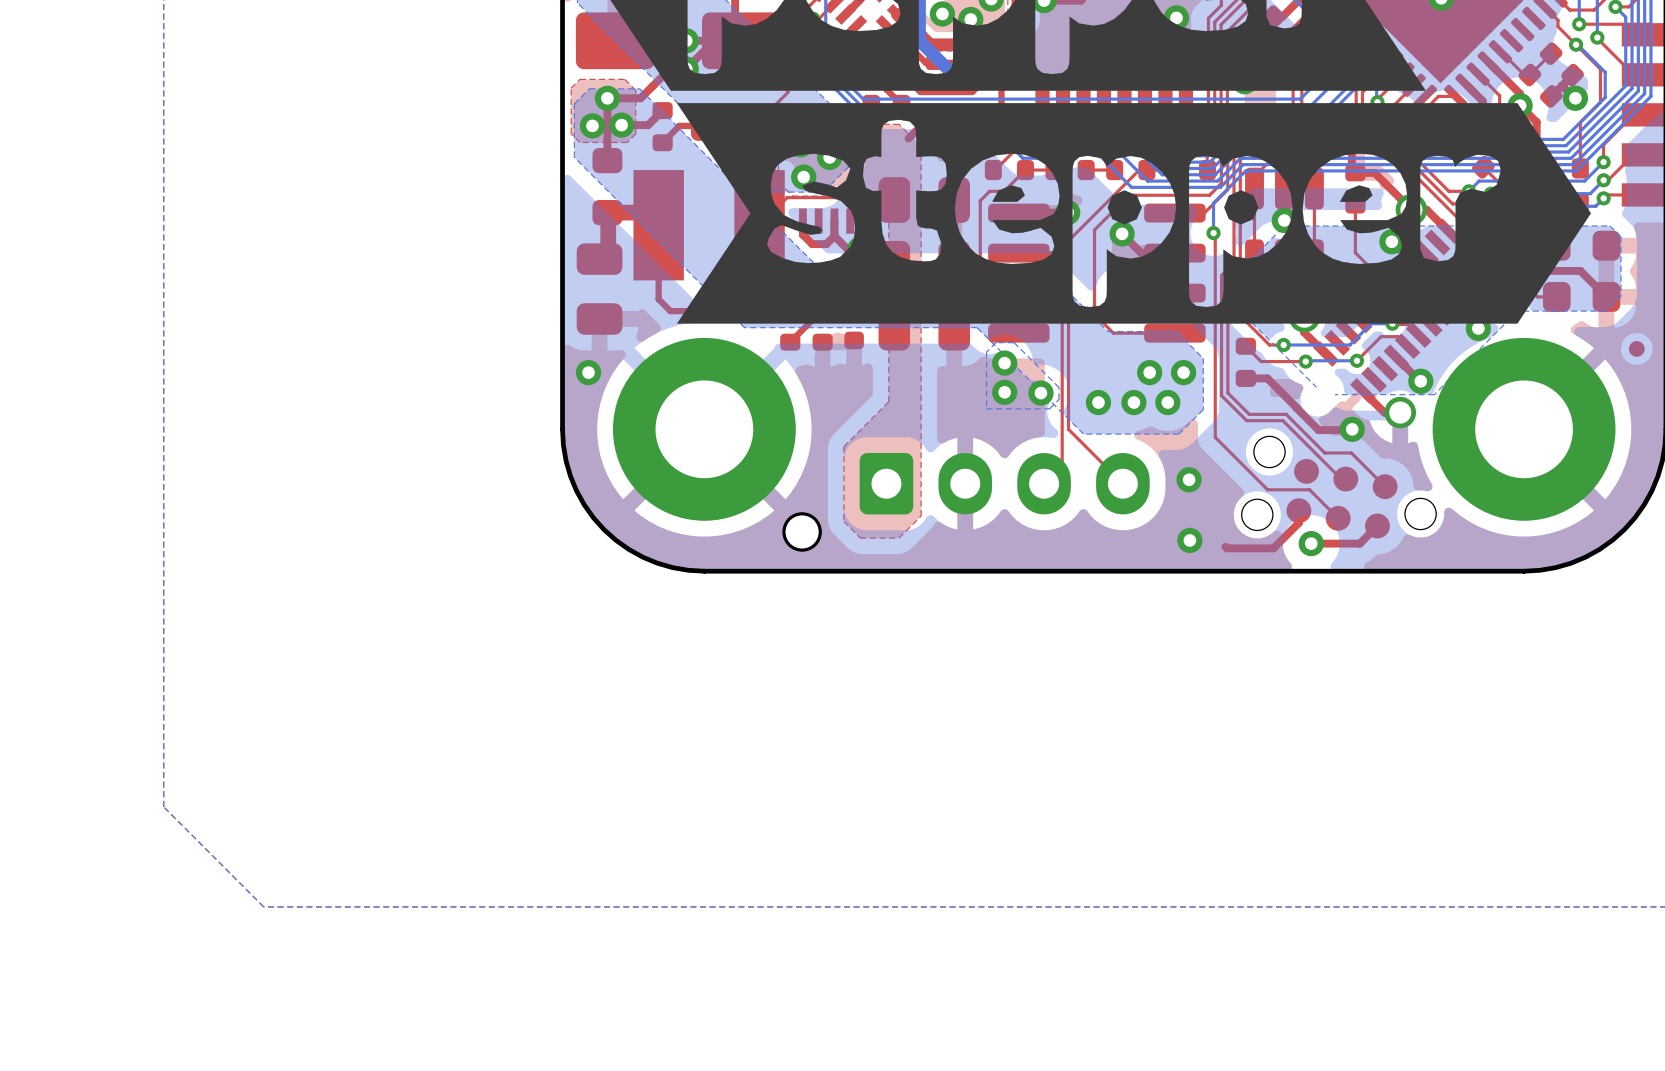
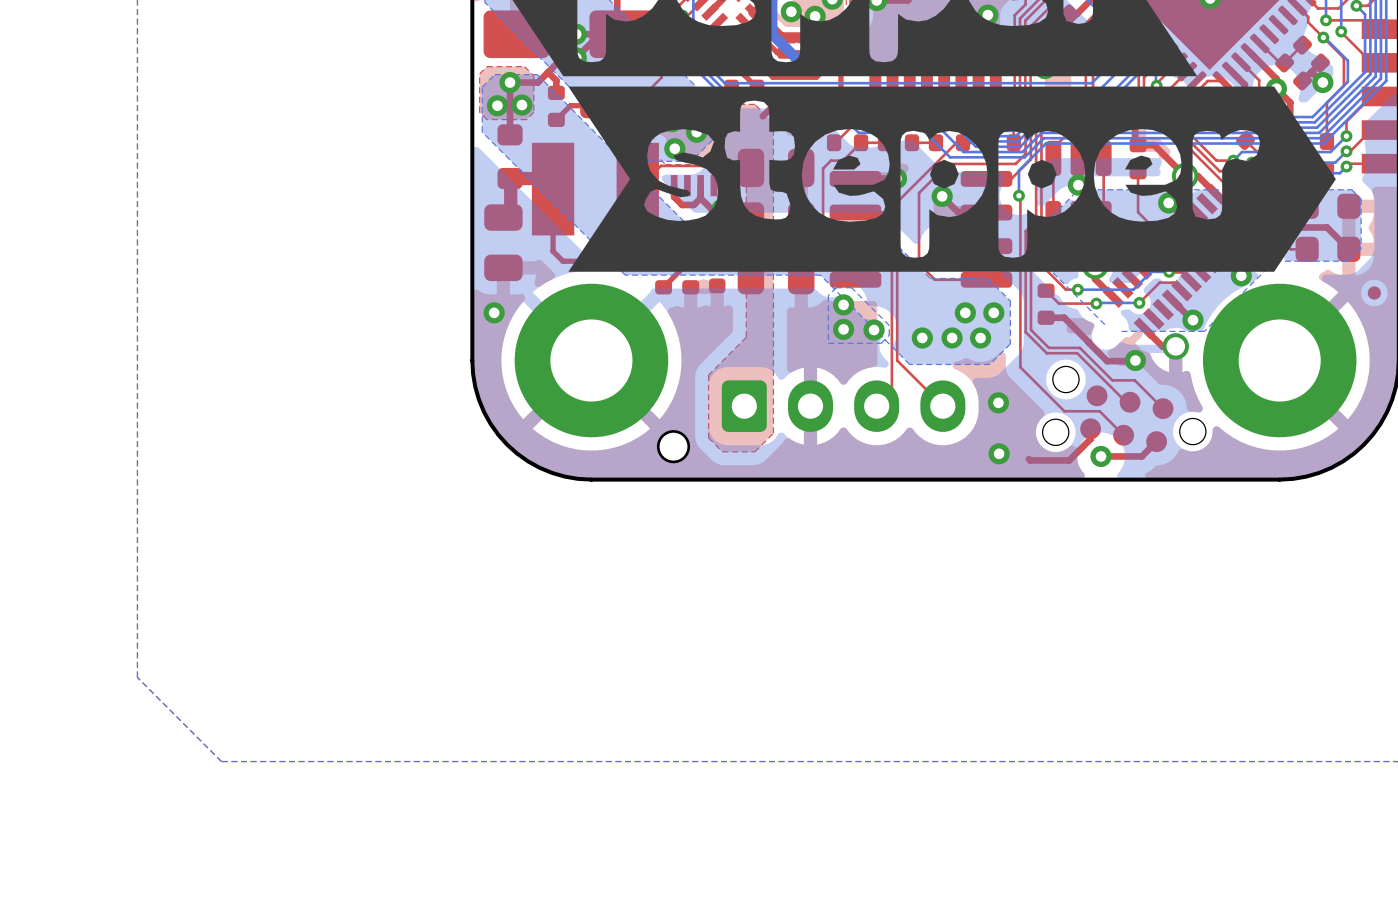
top track: (662, 110) (648, 125) (621, 125) -> (556, 92) (556, 80) (548, 72)

